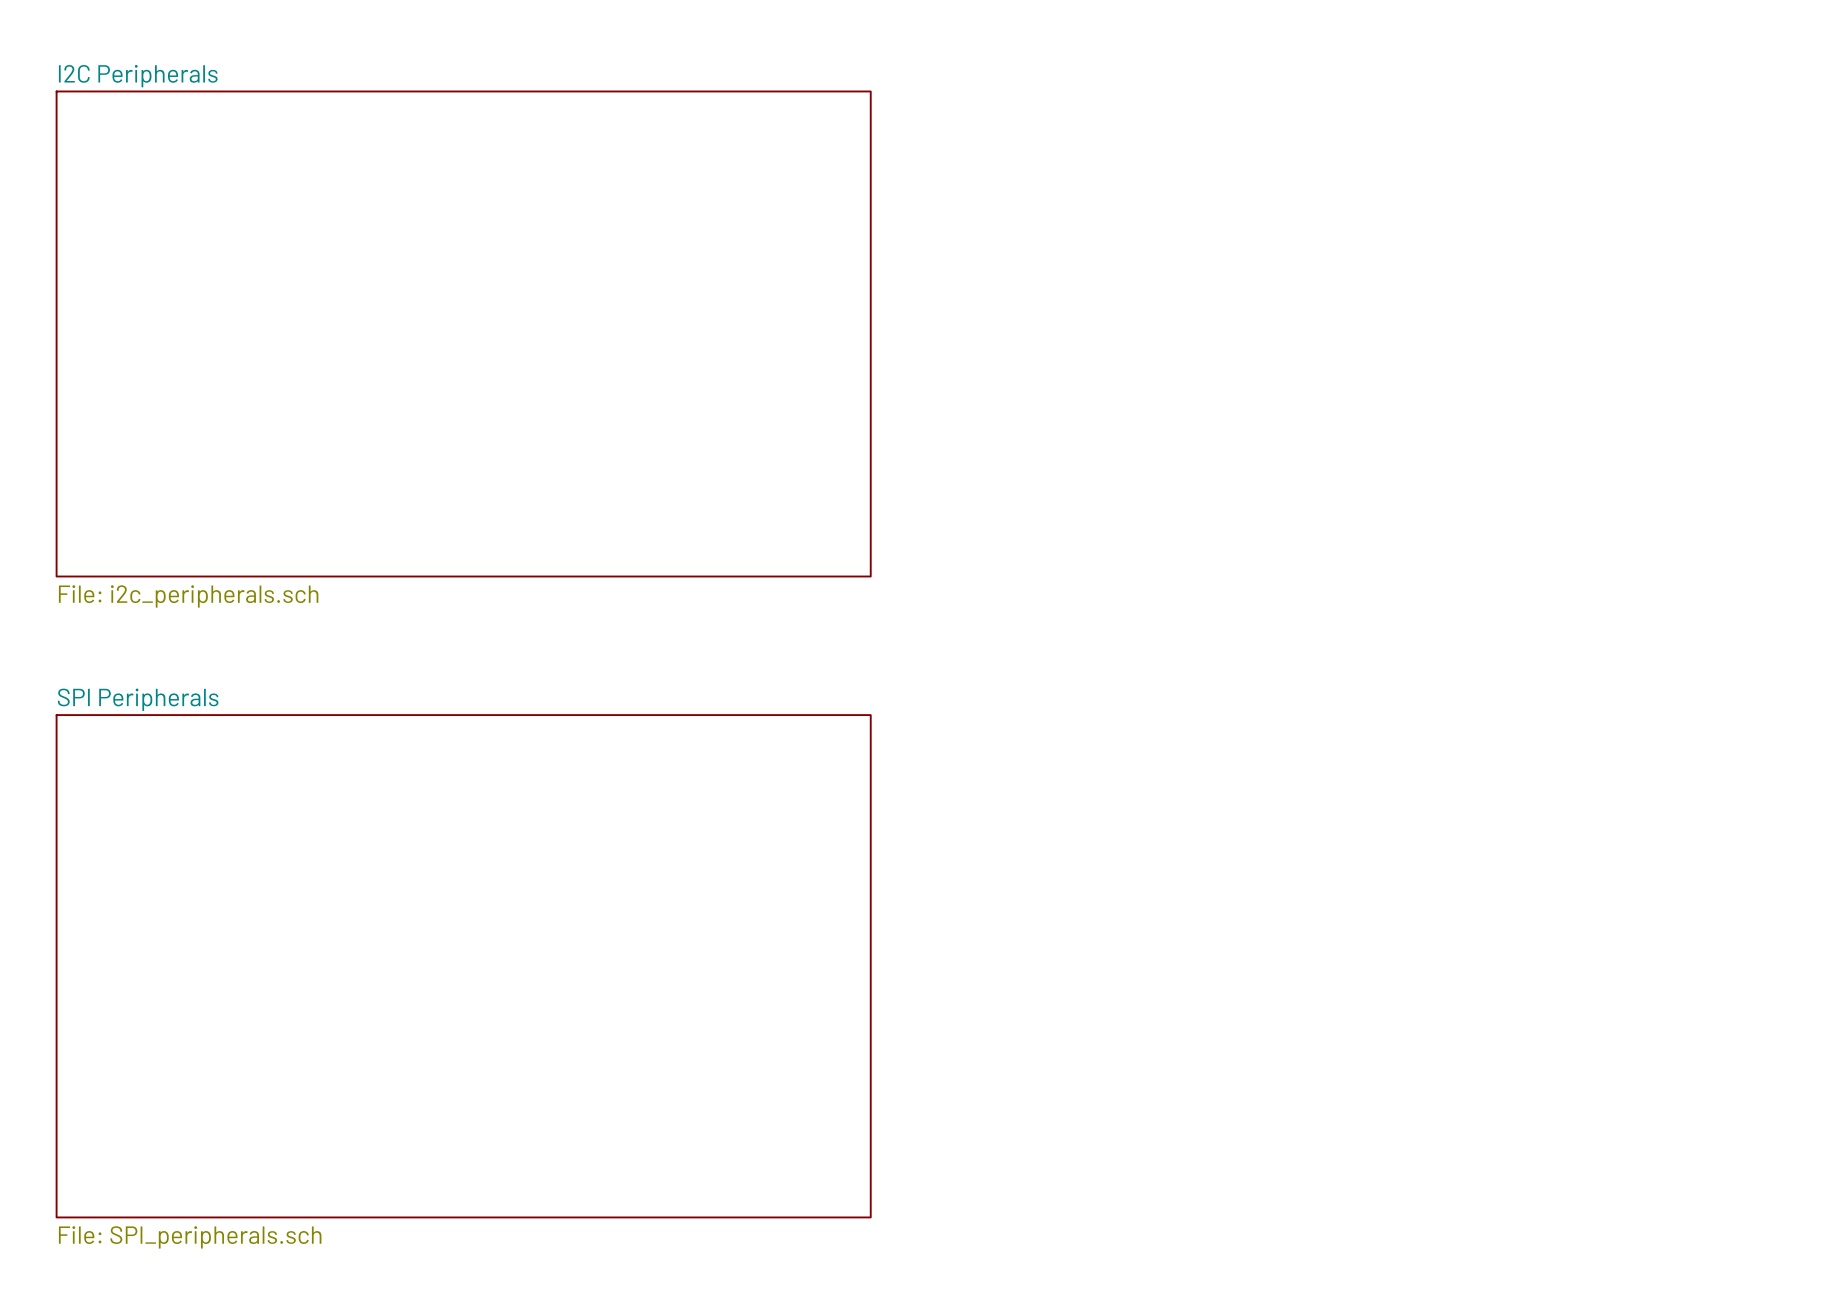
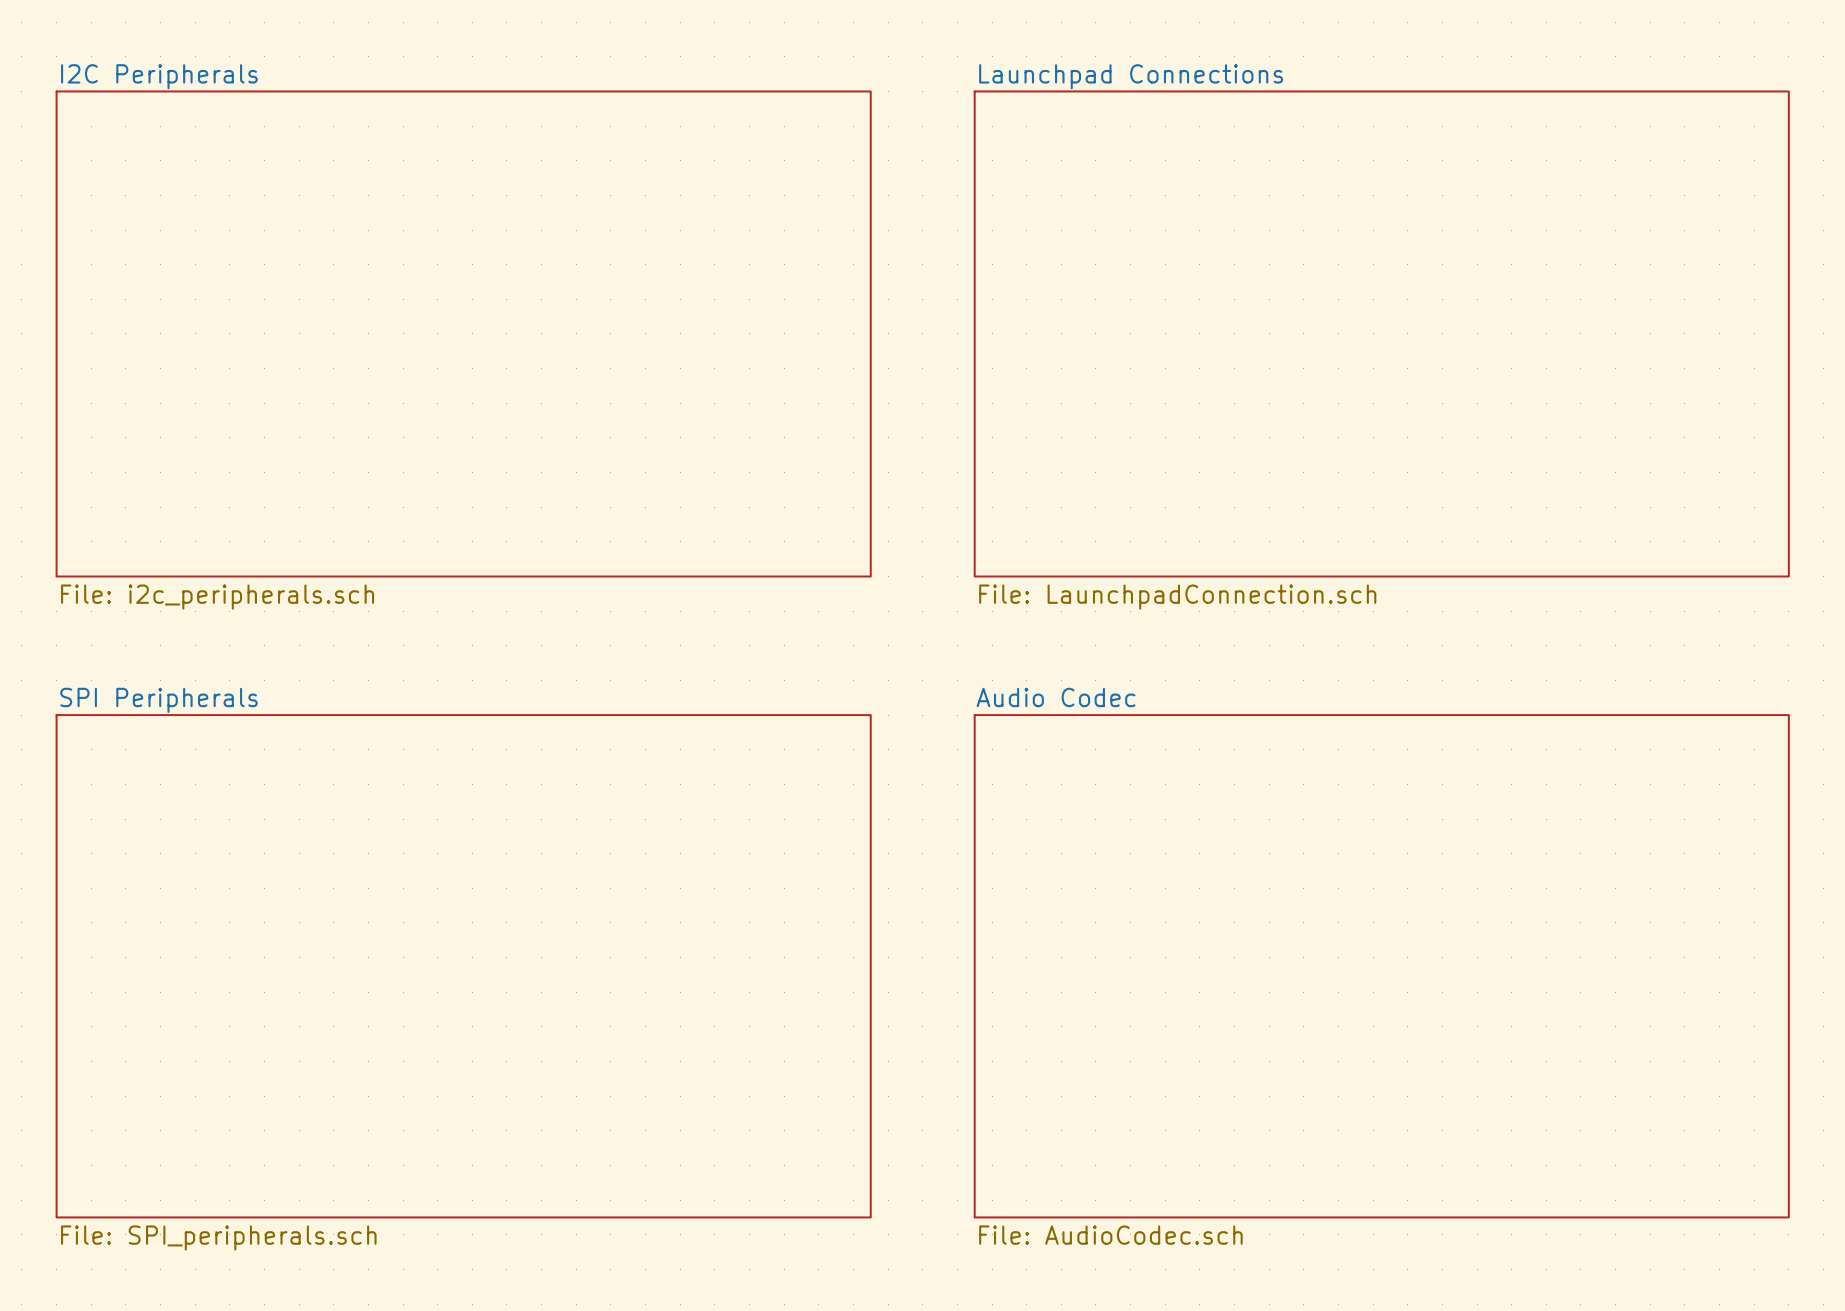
sheet Launchpad Connections: none -> File: LaunchpadConnection.sch (1381, 333)
sheet Audio Codec: none -> File: AudioCodec.sch (1381, 966)

